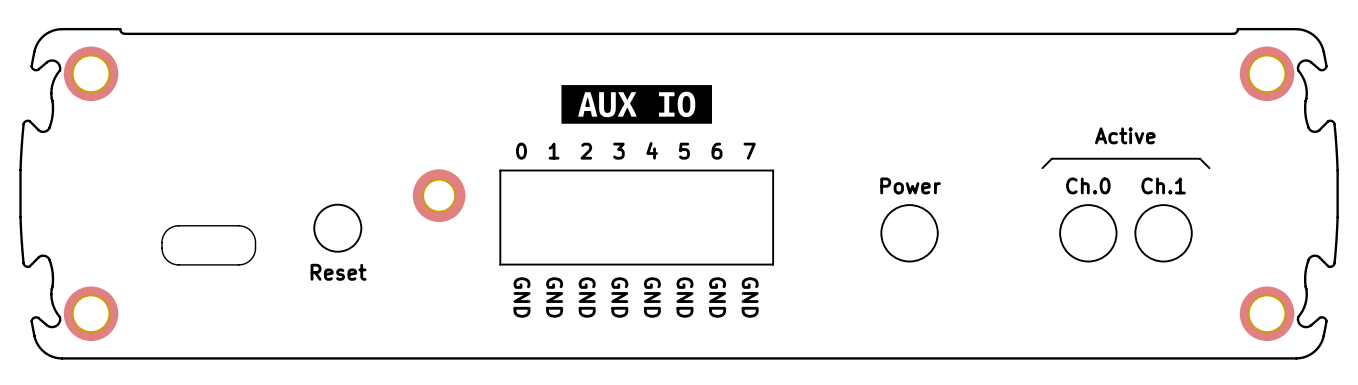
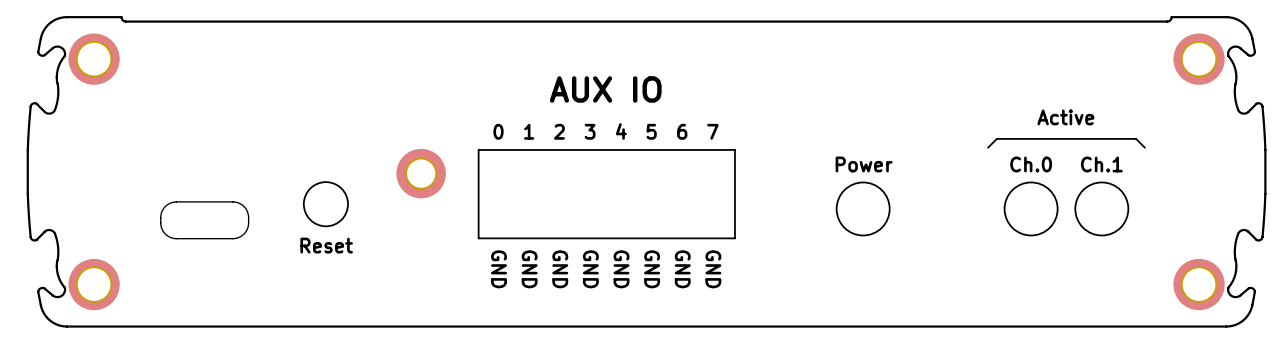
drawing: [561, 85, 712, 124] -> none
text: none -> AUX IO (605, 89)

